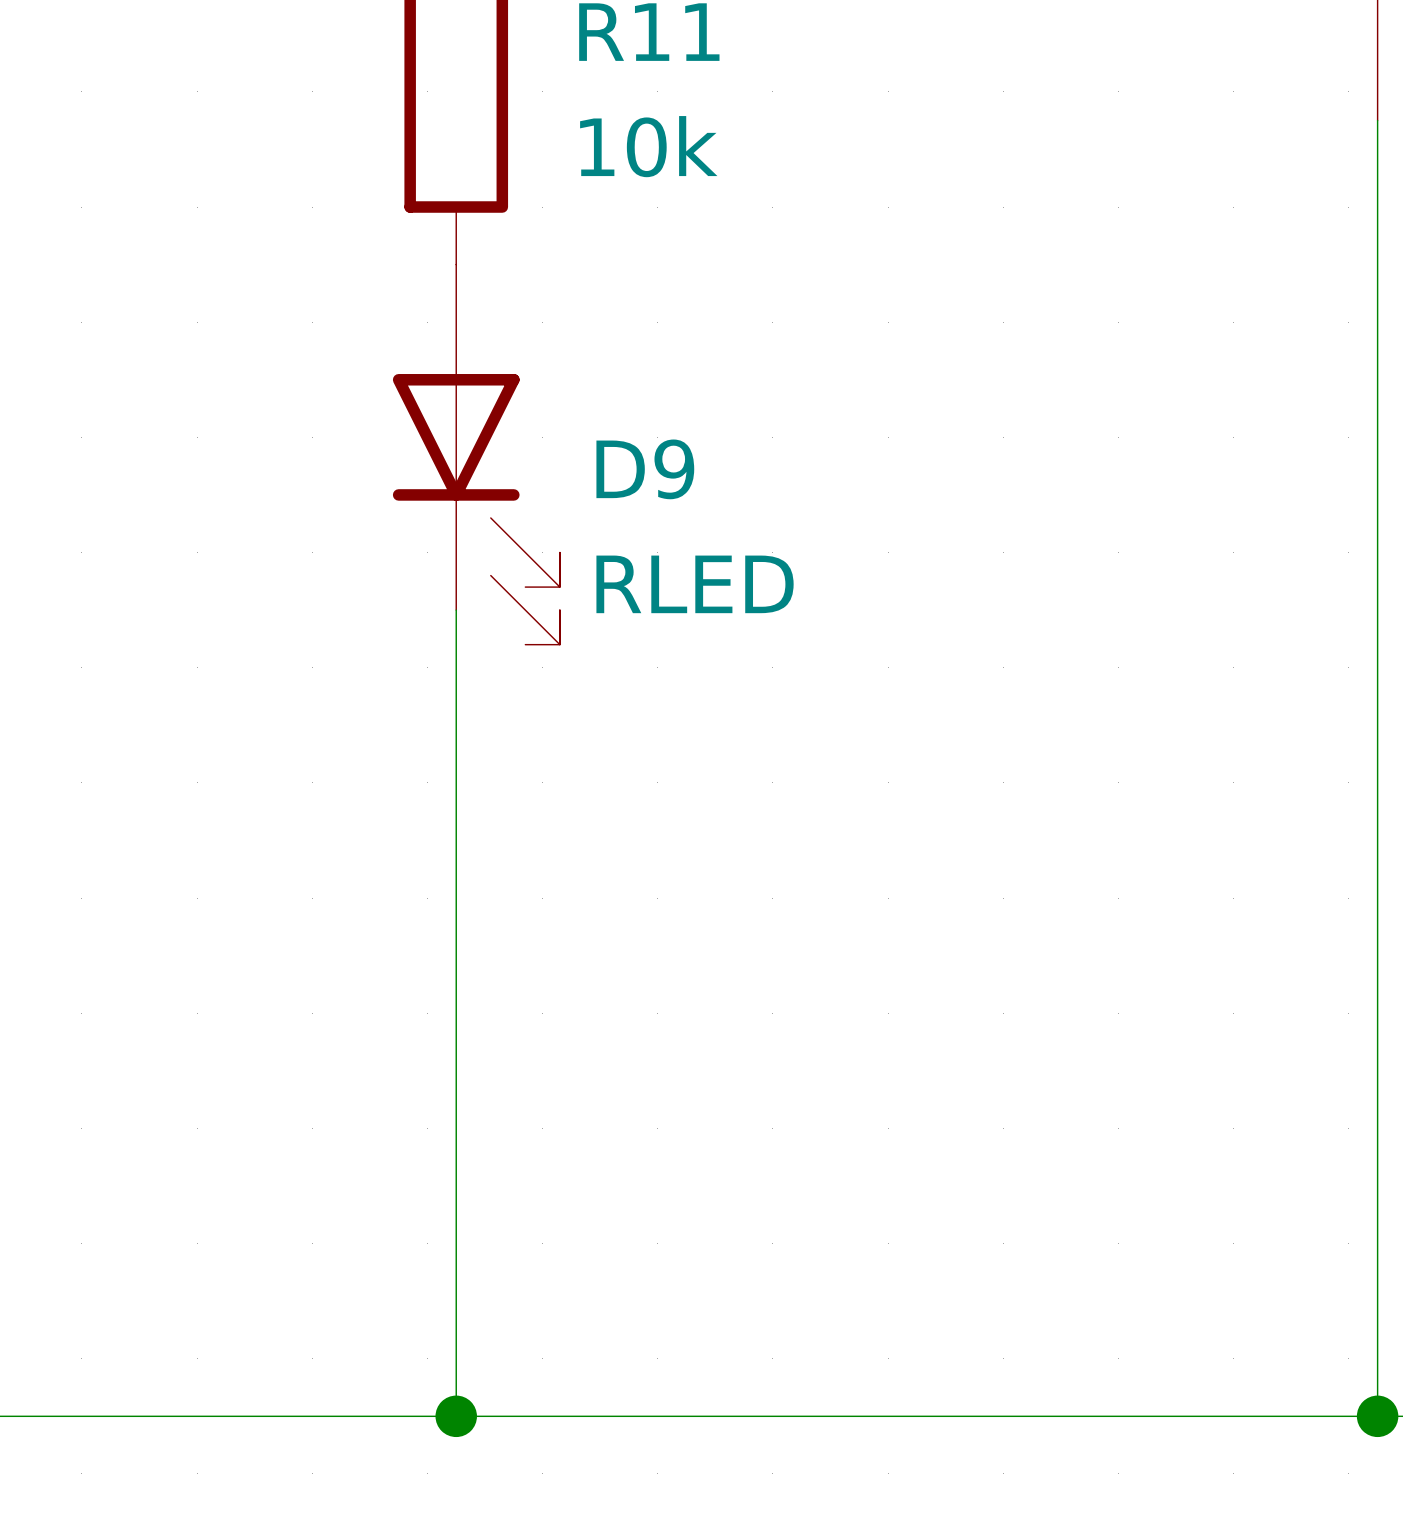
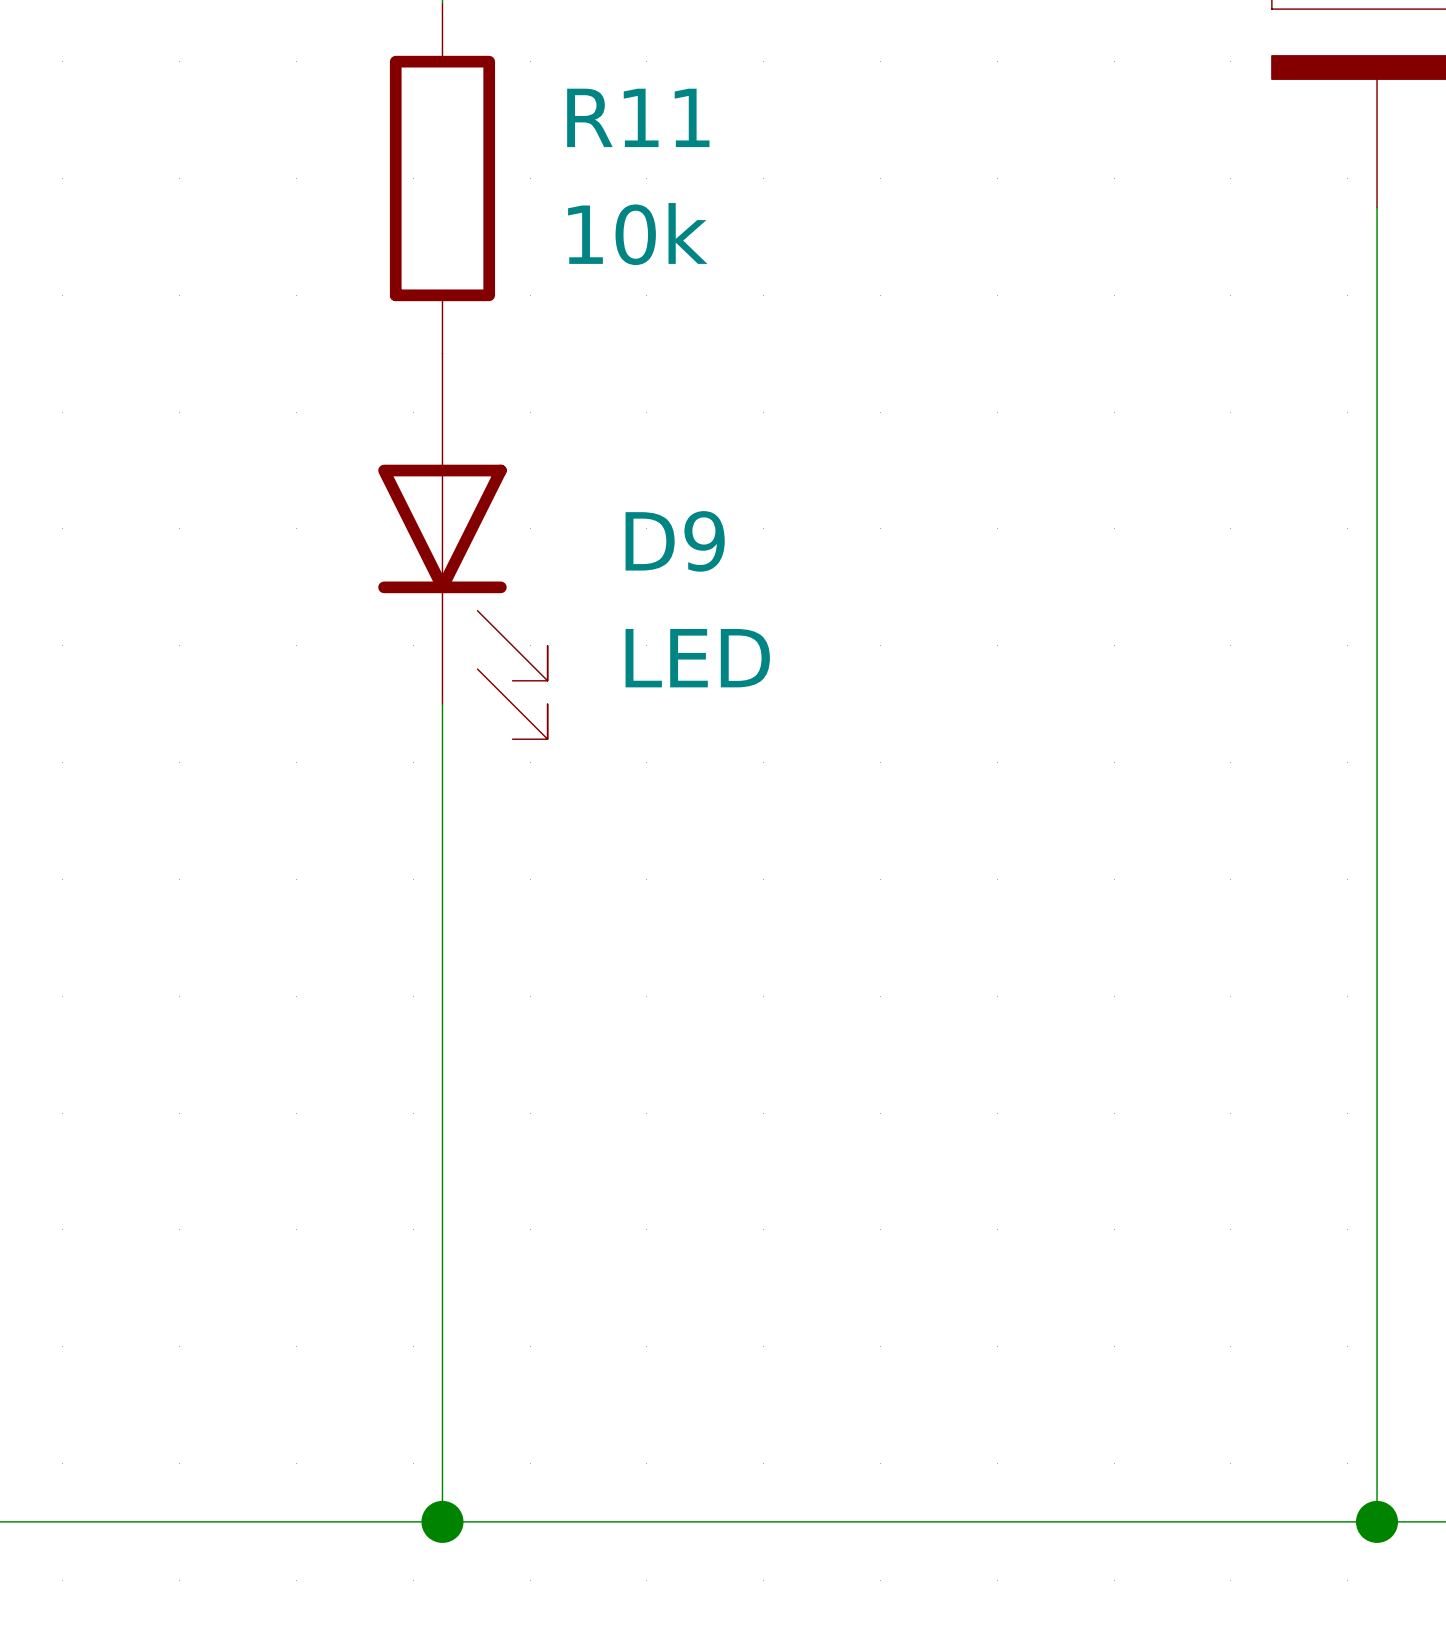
D9 name position: D9 (645, 469) -> D9 (675, 541)
D9 value: RLED (695, 584) -> LED (697, 658)

